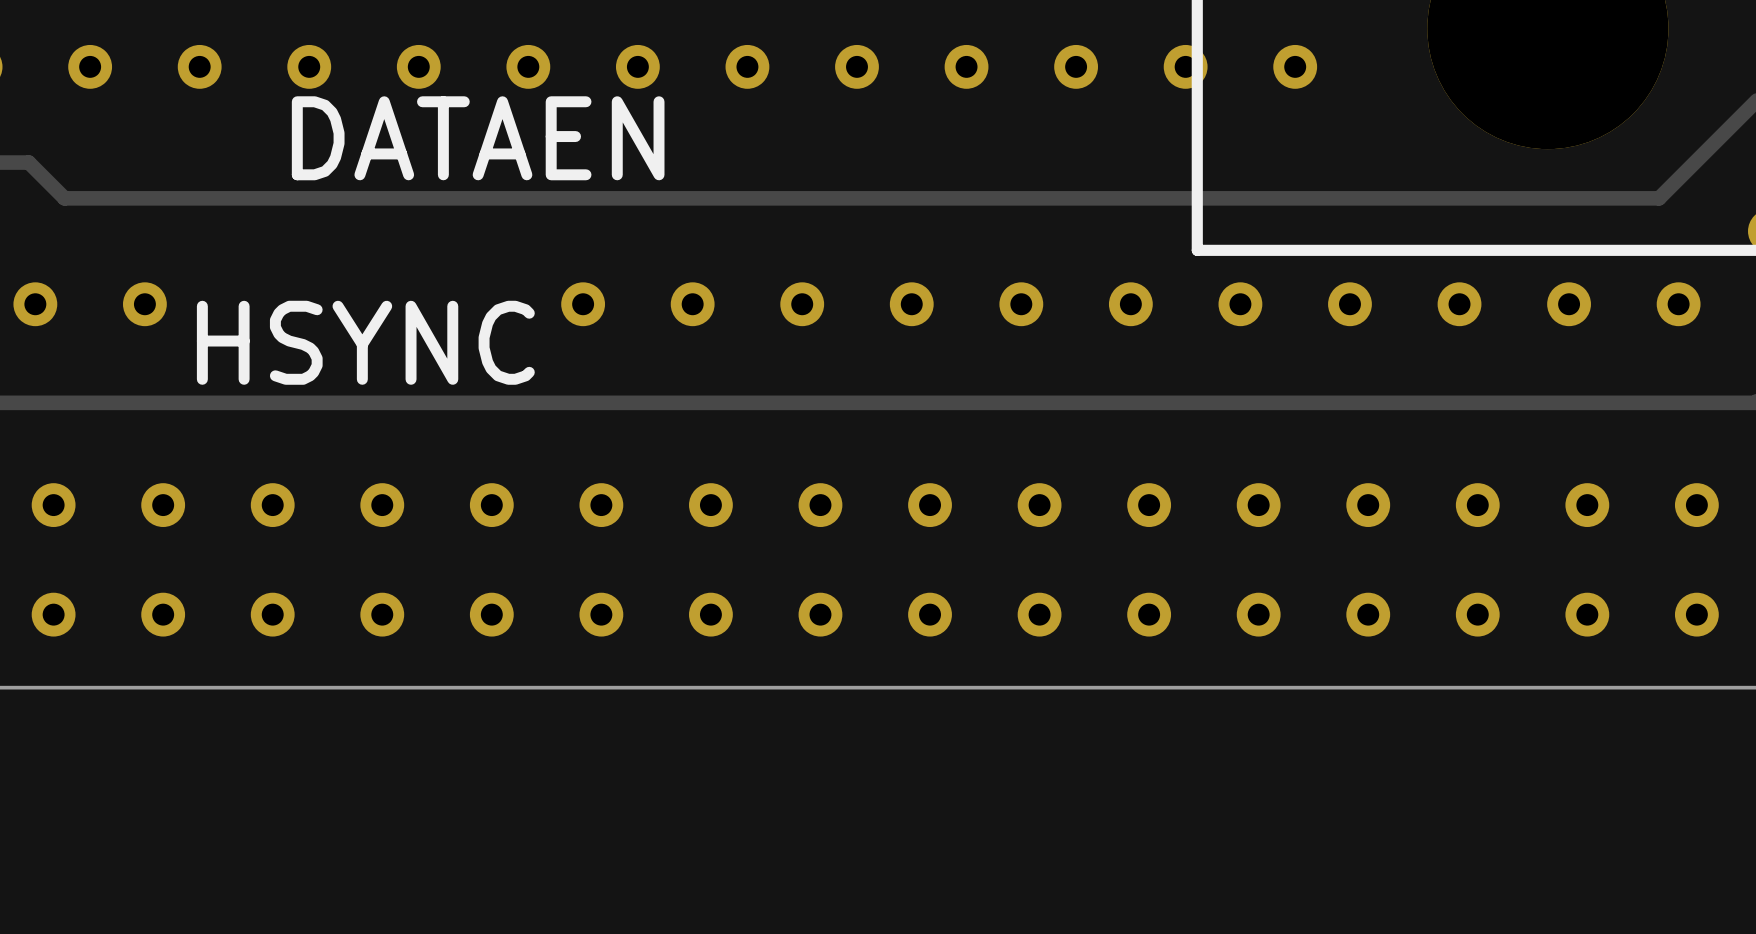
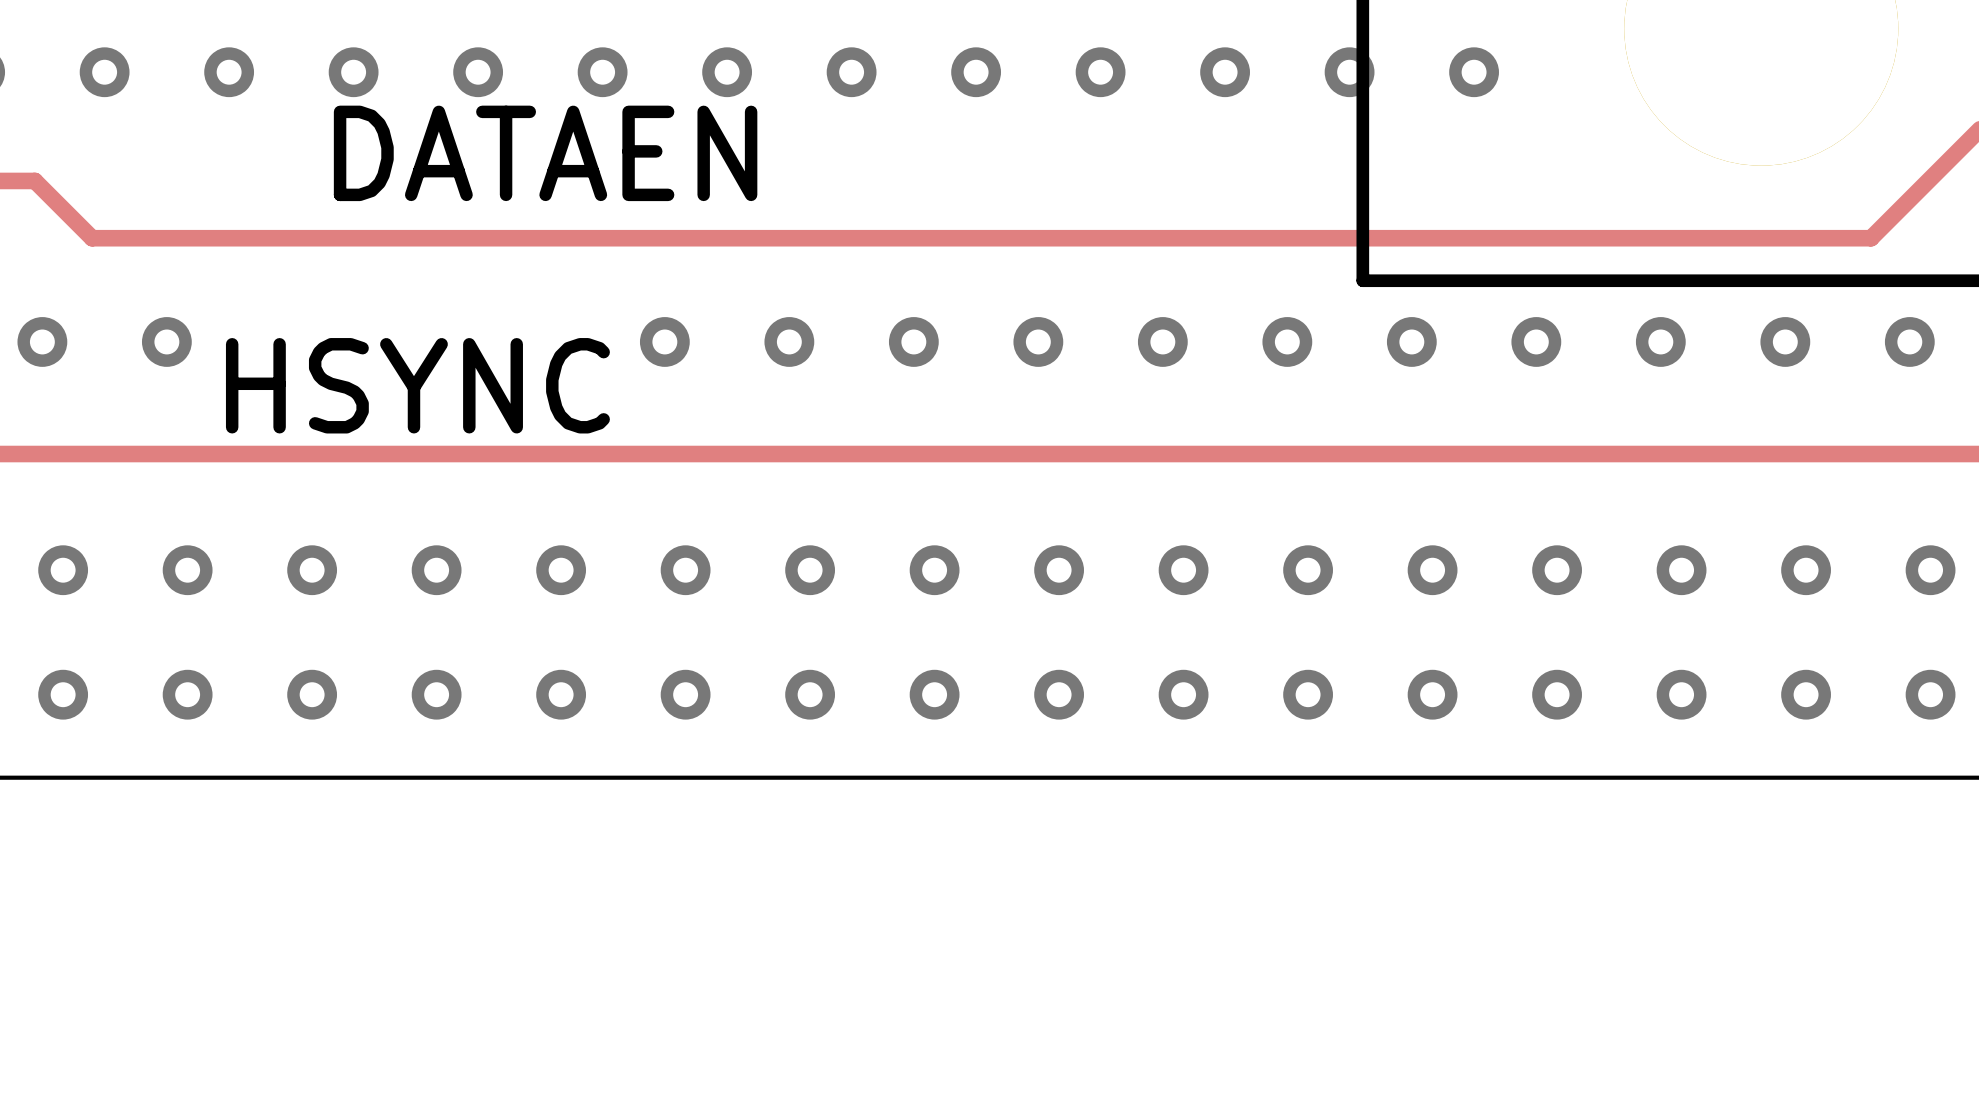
track: (64, 198) (1659, 198) -> (75, 221) (92, 238) (1871, 238) (1887, 221)

